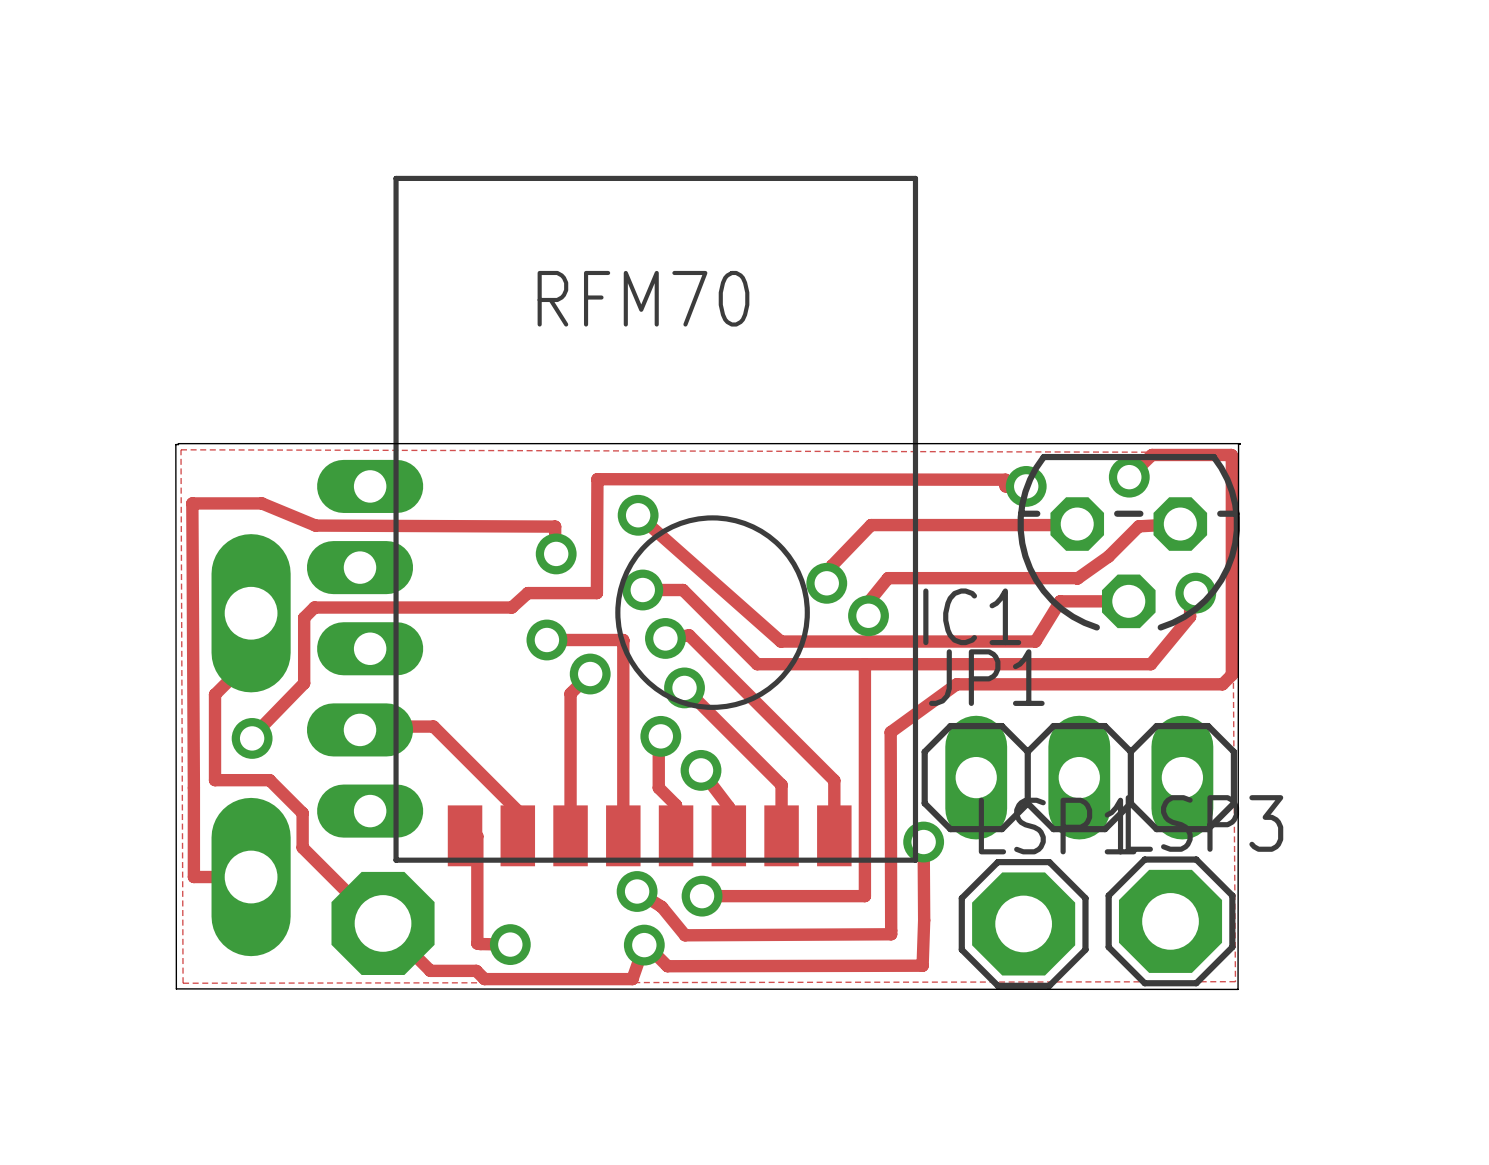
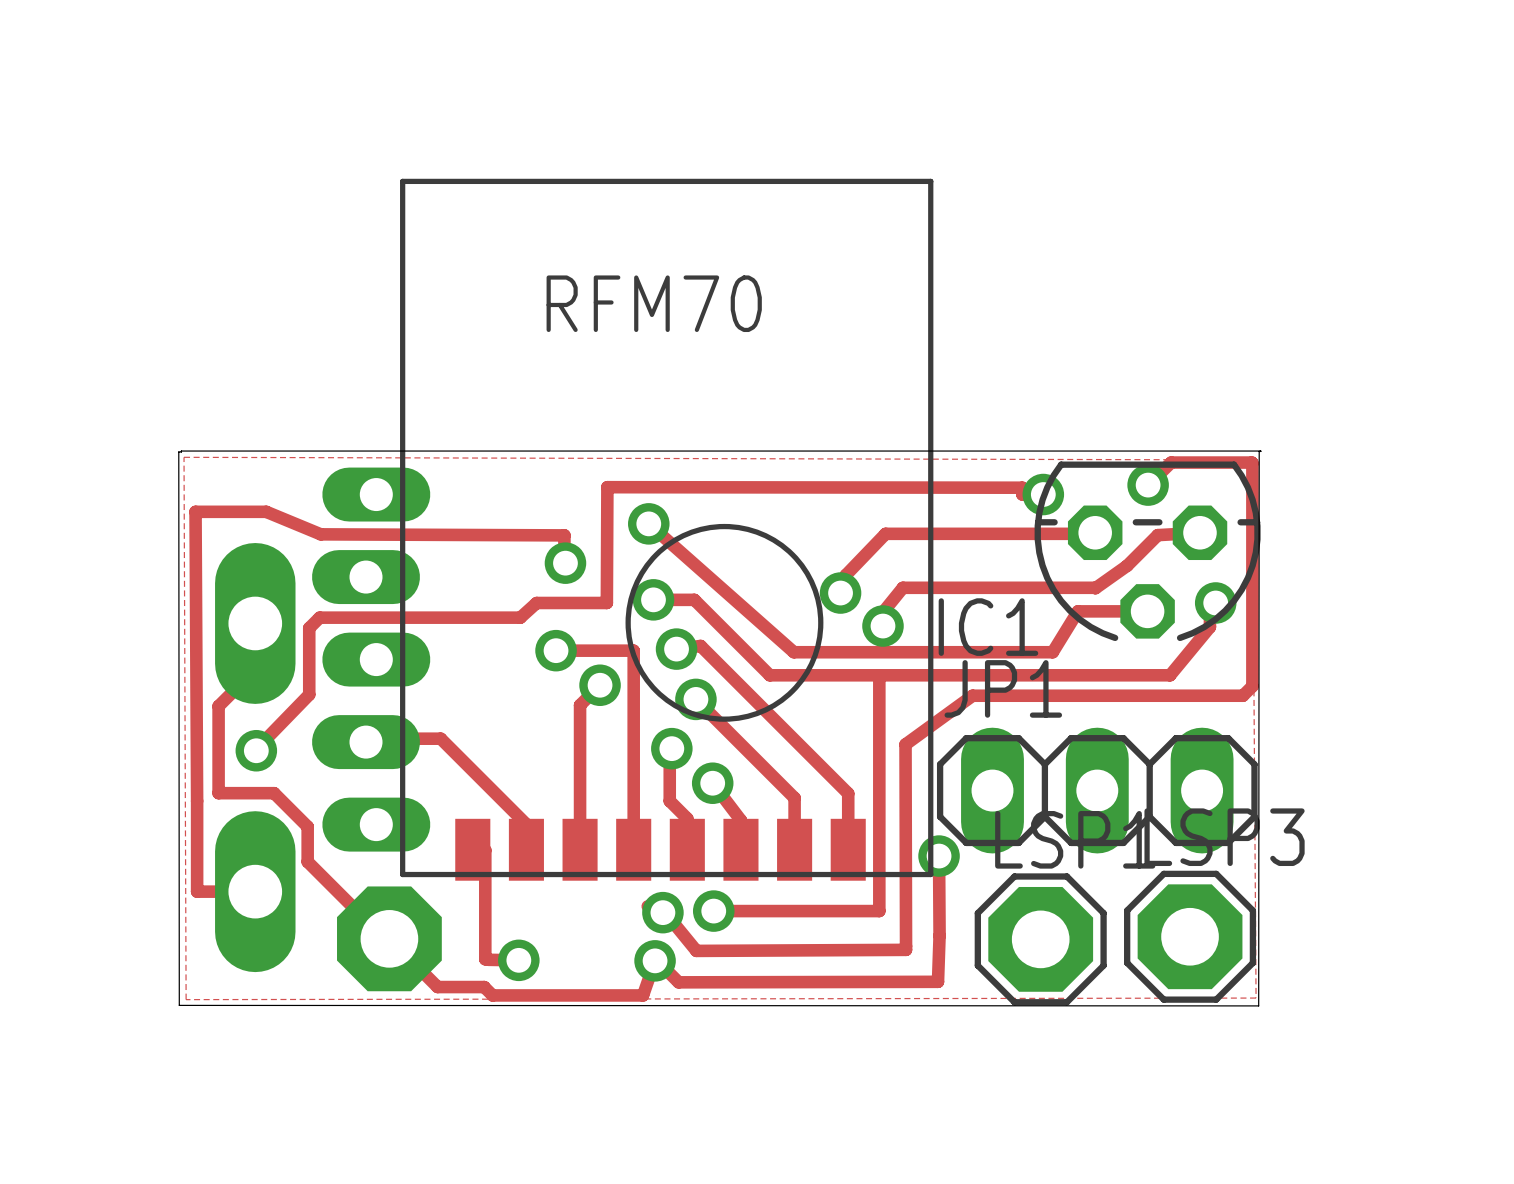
via position: (637, 891) -> (662, 912)

